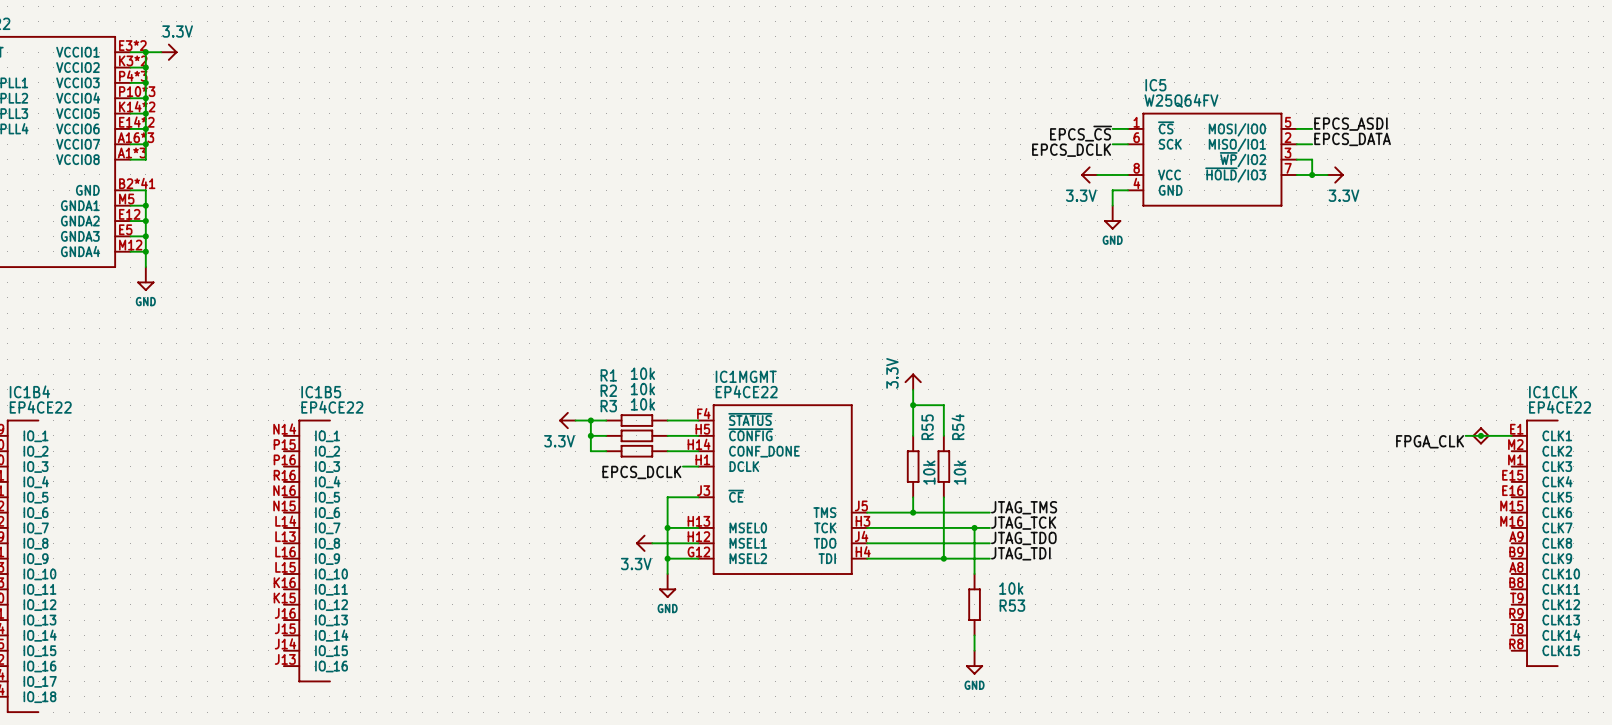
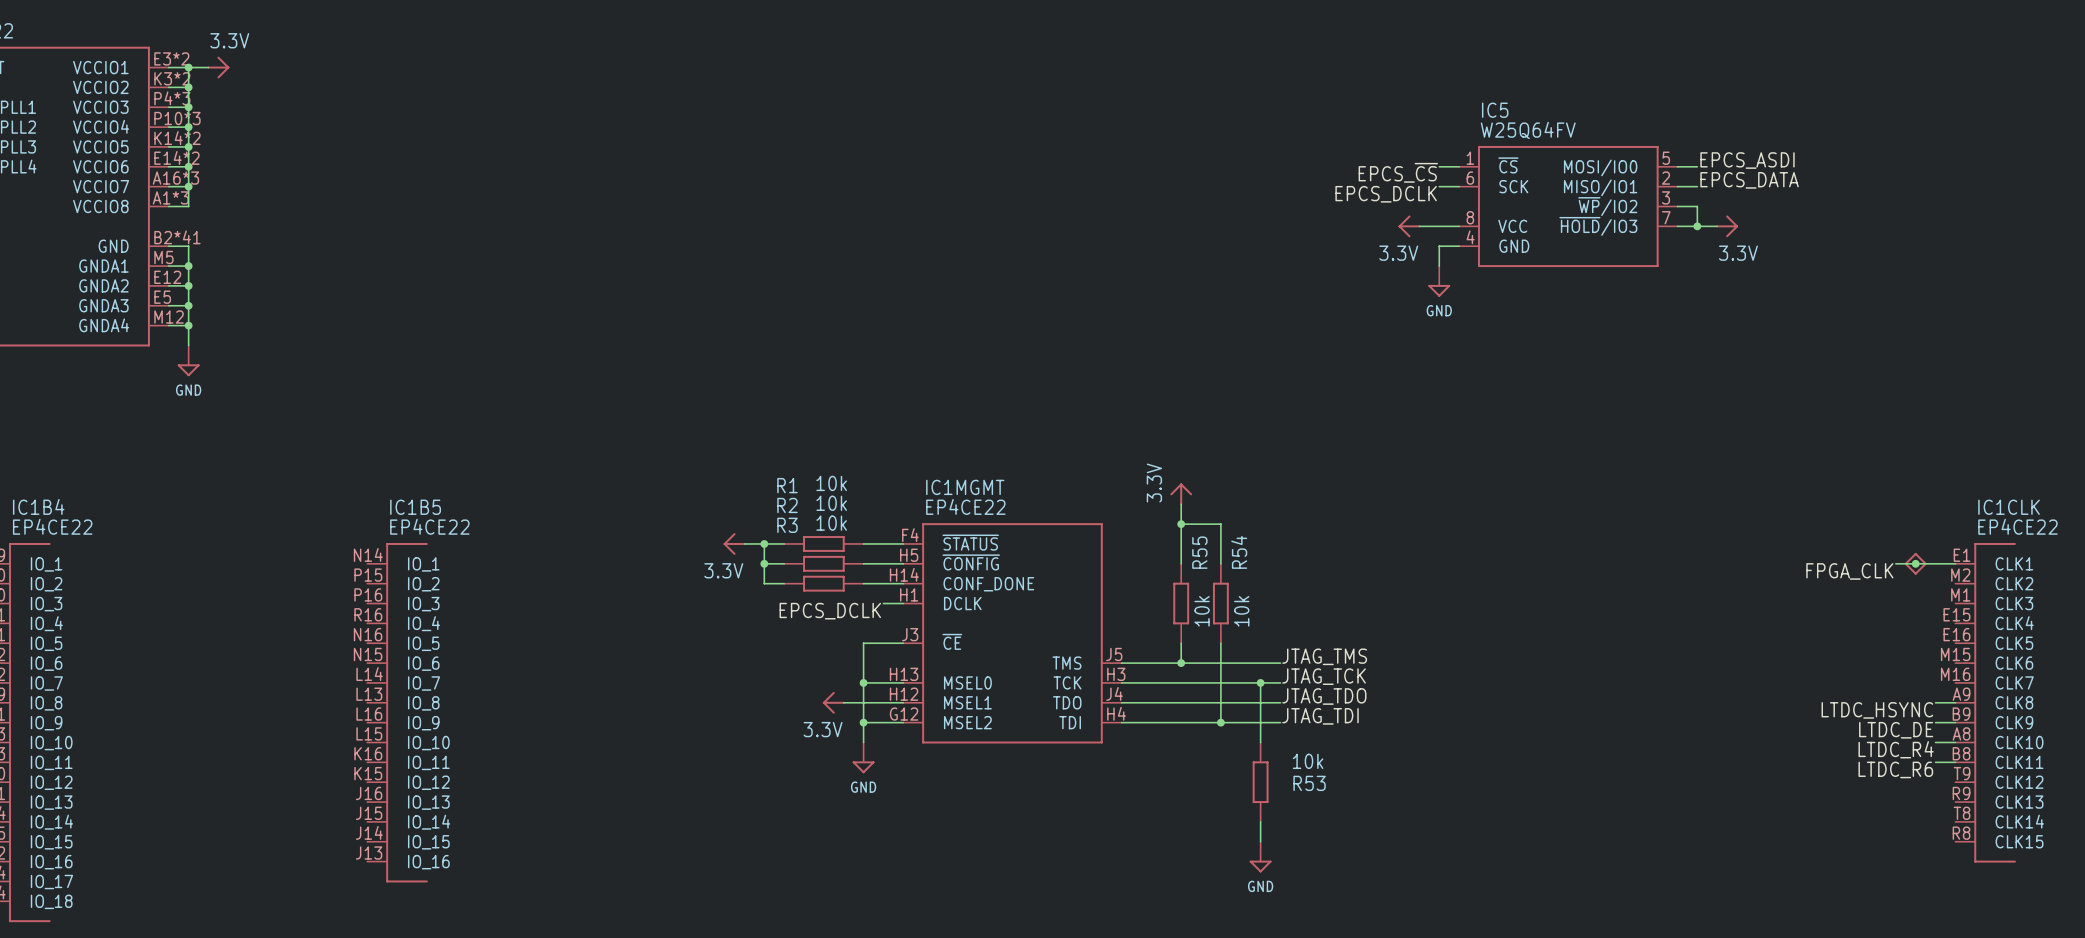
wire: none -> (1935, 702) (1955, 702)
label: none -> LTDC_HSYNC (1877, 710)
wire: none -> (1935, 722) (1955, 722)
label: none -> LTDC_DE (1896, 730)
wire: none -> (1935, 742) (1955, 742)
label: none -> LTDC_R4 (1896, 749)
wire: none -> (1935, 762) (1955, 762)
label: none -> LTDC_R6 (1895, 769)

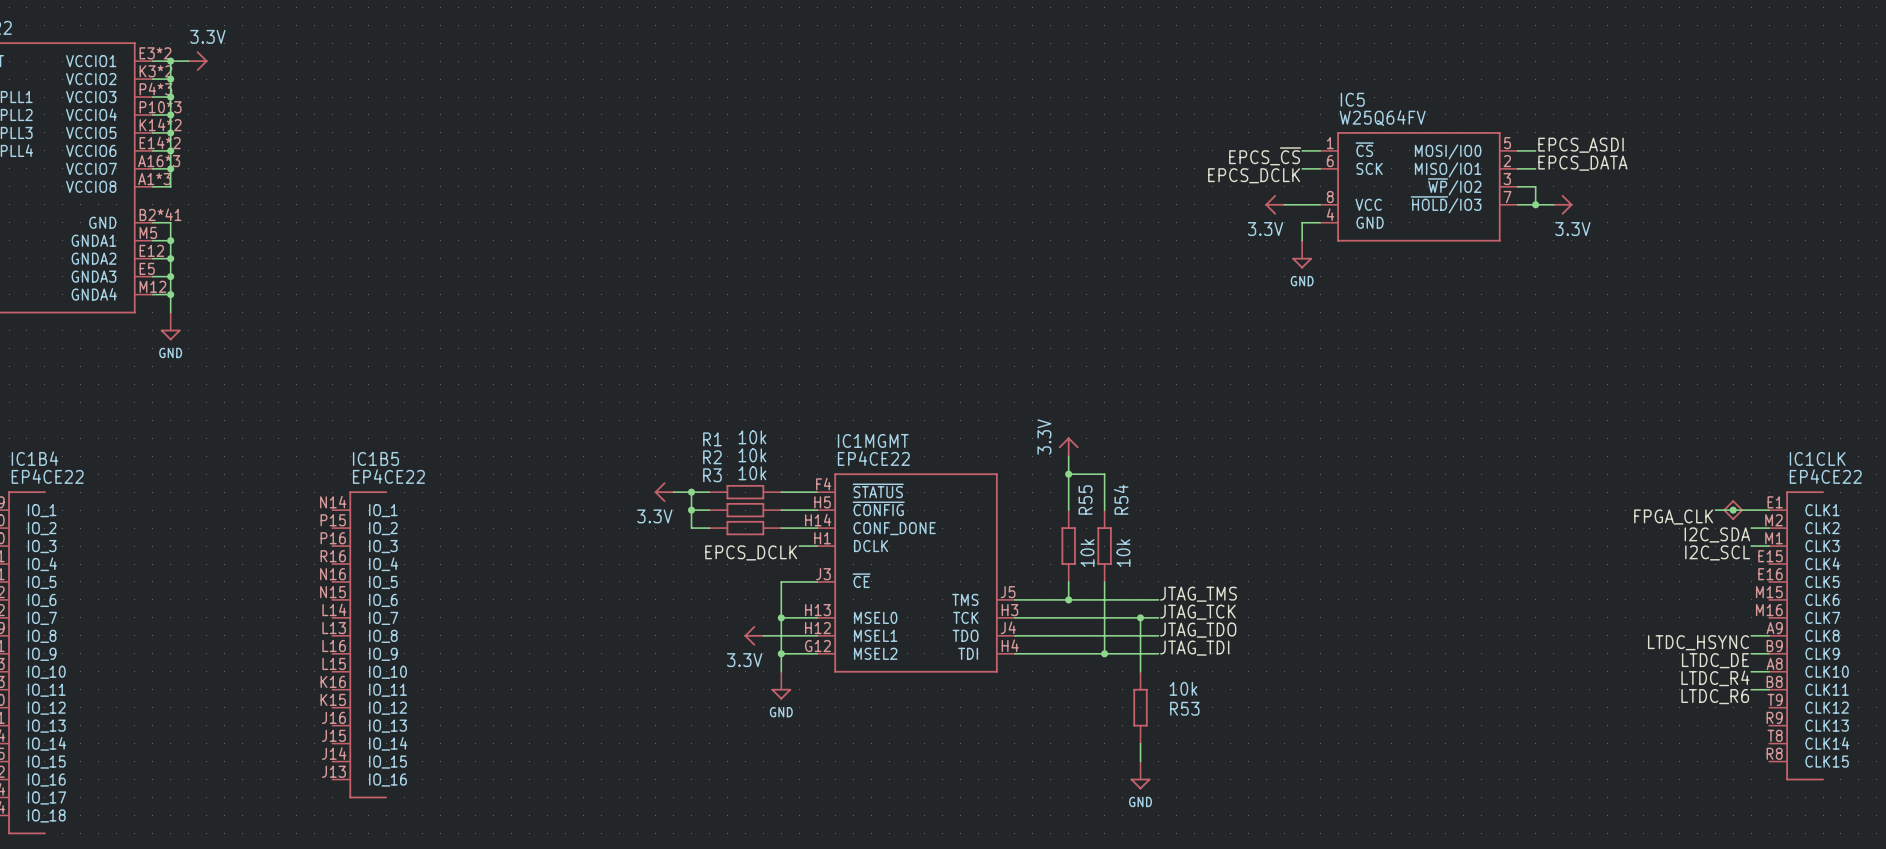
wire: none -> (1751, 528) (1769, 528)
label: none -> I2C_SDA (1717, 534)
wire: none -> (1751, 546) (1769, 546)
label: none -> I2C_SCL (1717, 552)

